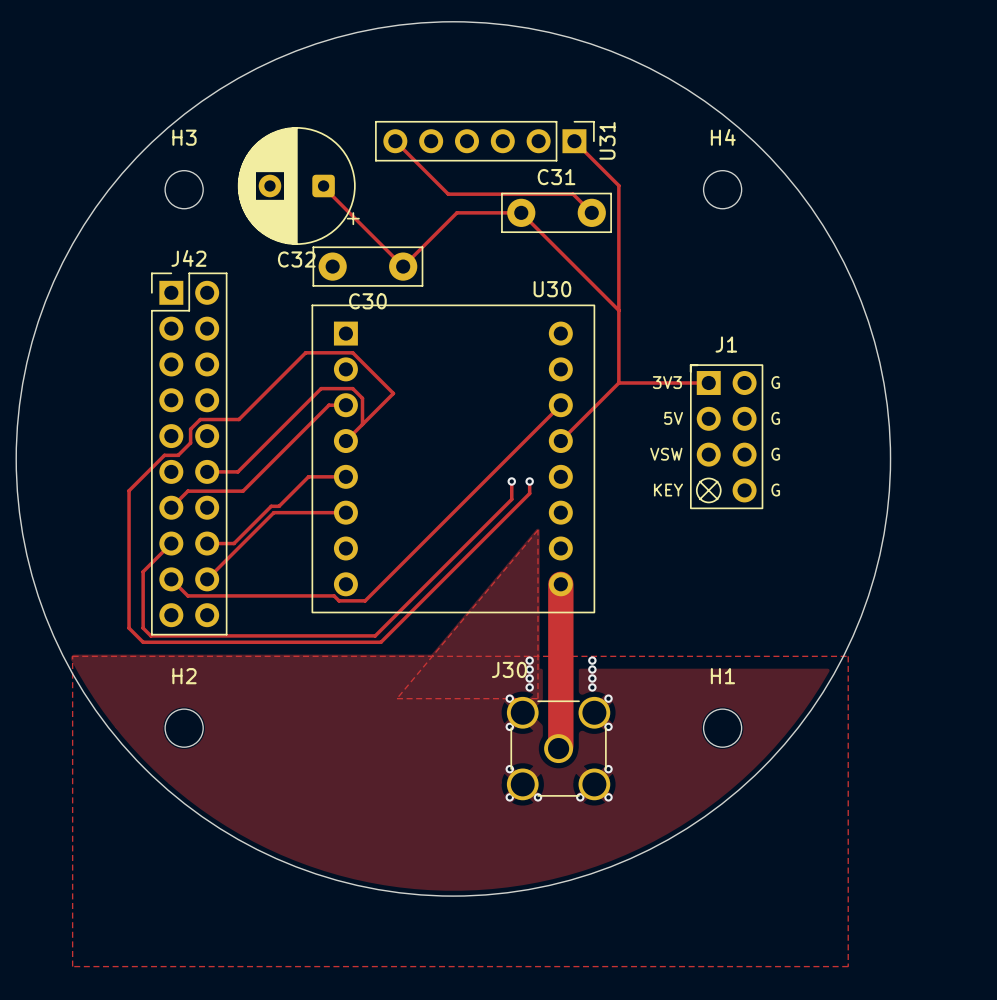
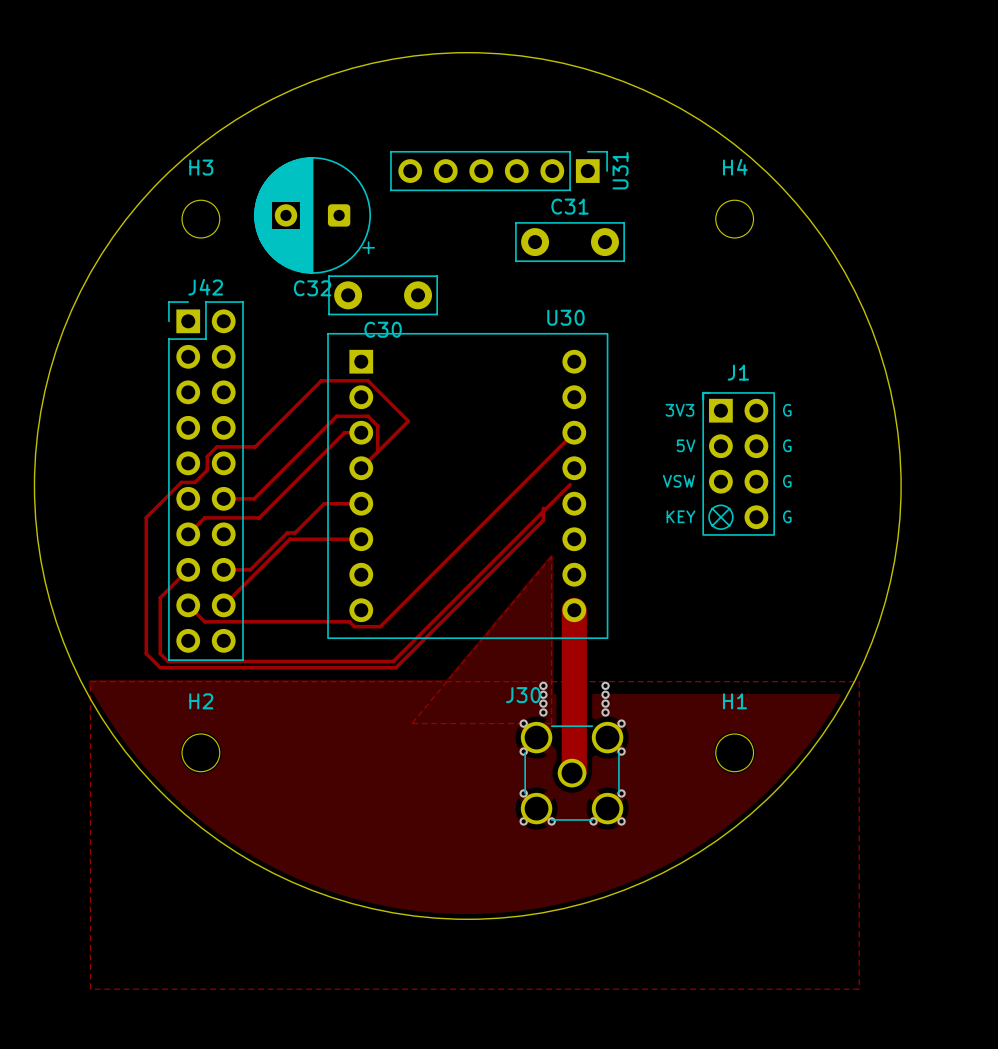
track: (395, 141) (448, 194) (573, 194) (591, 212) -> none
track: (574, 141) (618, 185) (618, 382) -> none
track: (323, 185) (403, 266) (456, 212) (521, 212) (618, 310) -> none
track: (618, 382) (560, 441) -> none
track: (618, 382) (708, 382) -> none
track: (511, 481) (511, 499) (375, 635) -> (570, 484) (393, 661) (390, 661)
via: (511, 481) -> none
via: (529, 481) -> none

